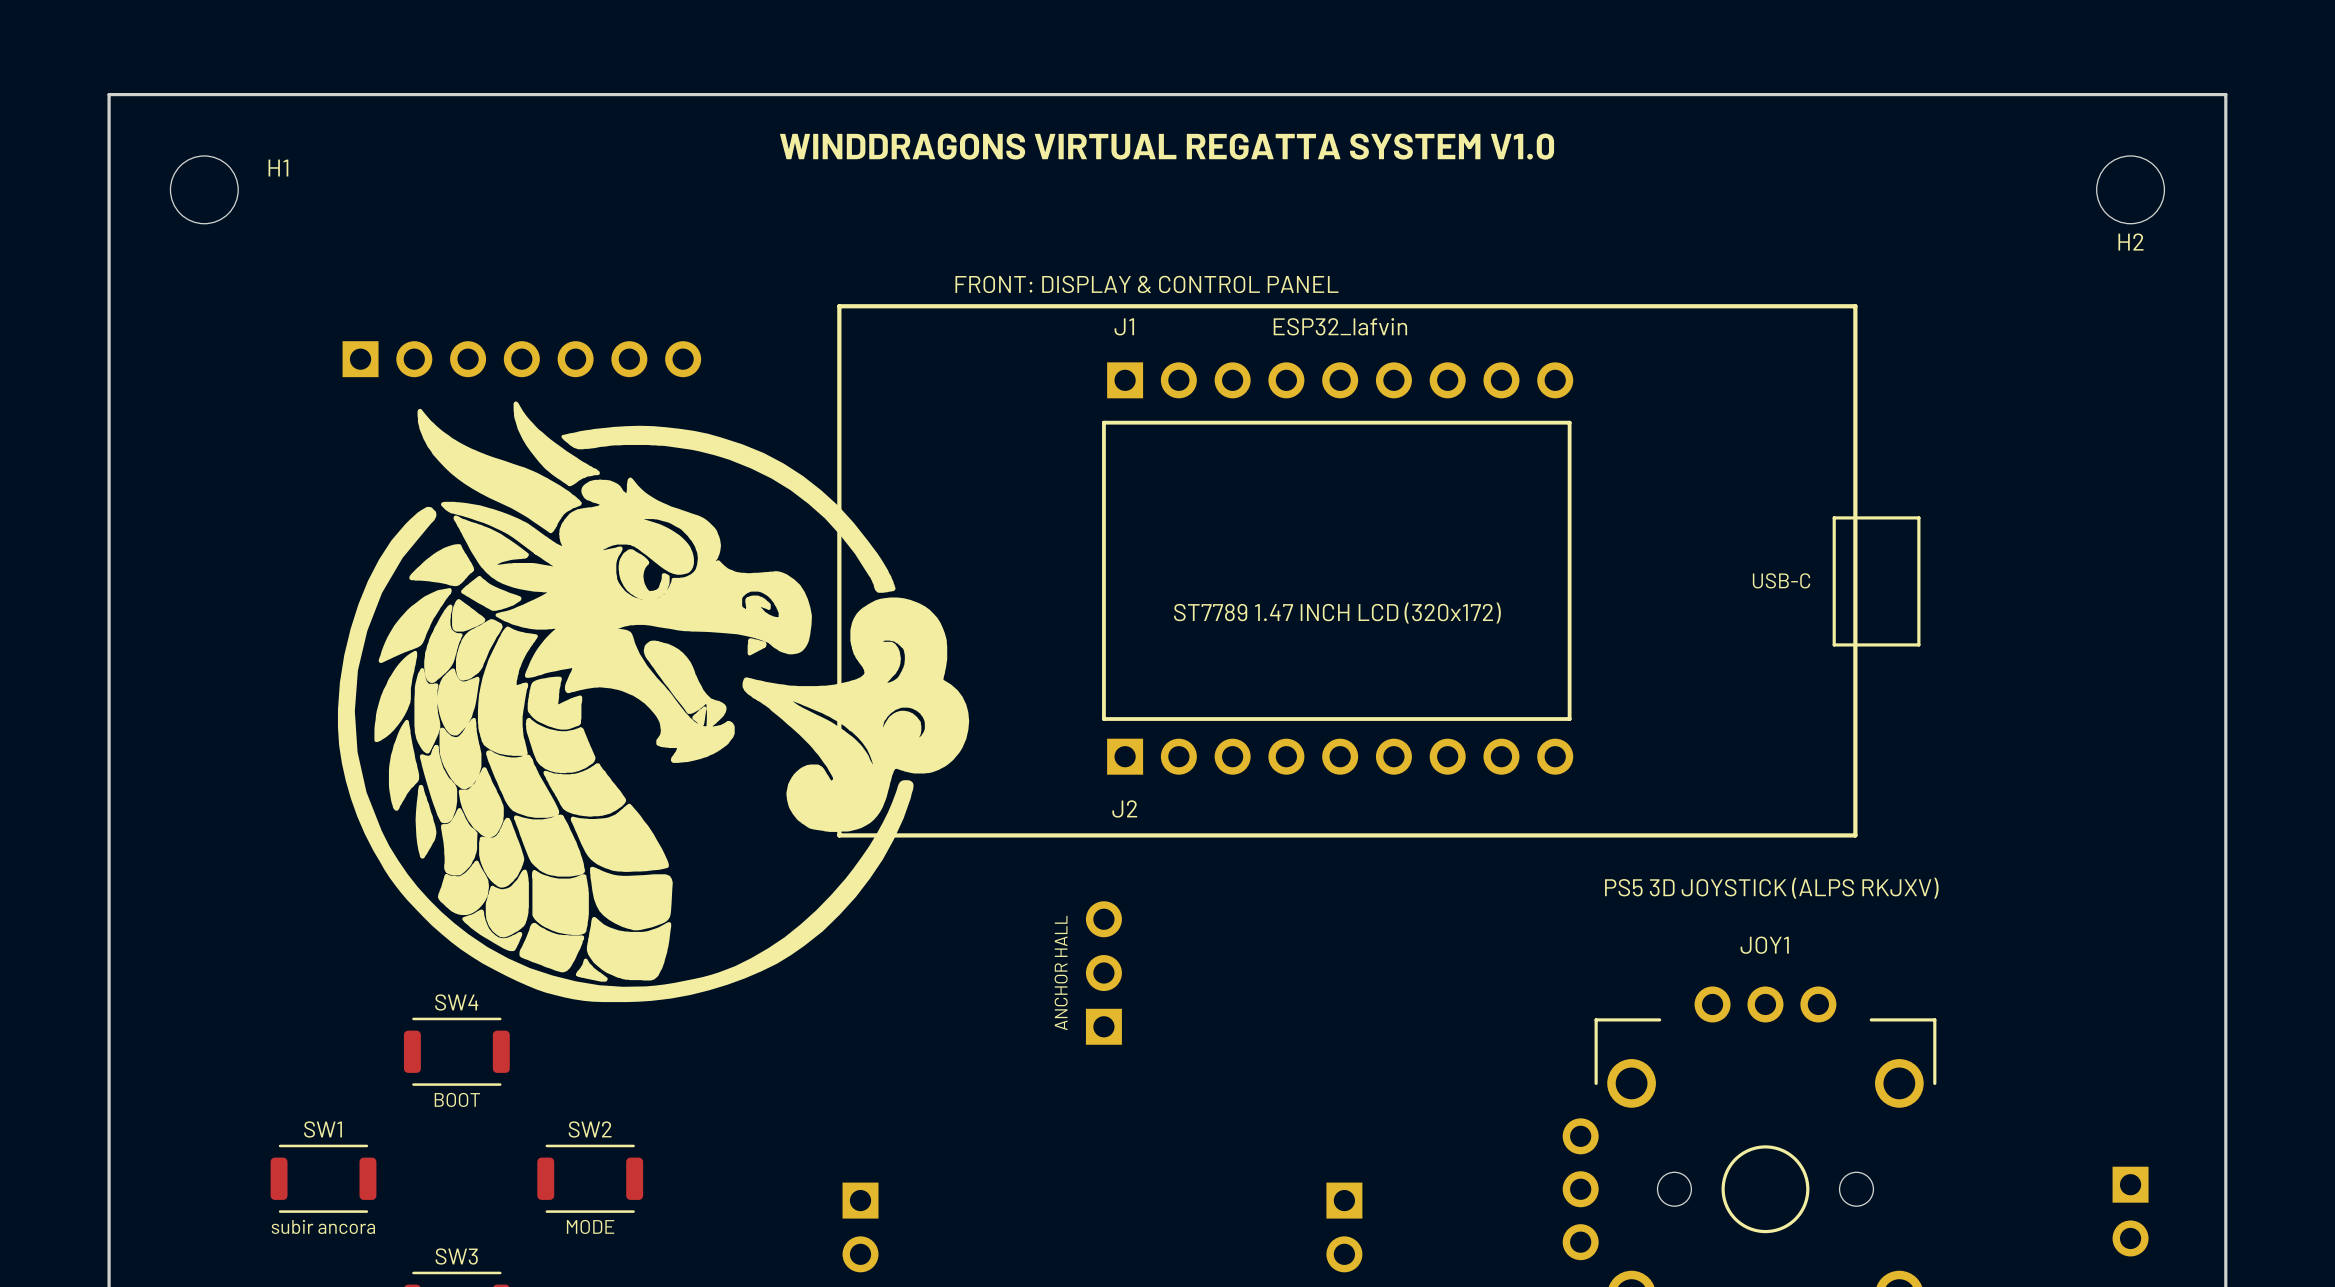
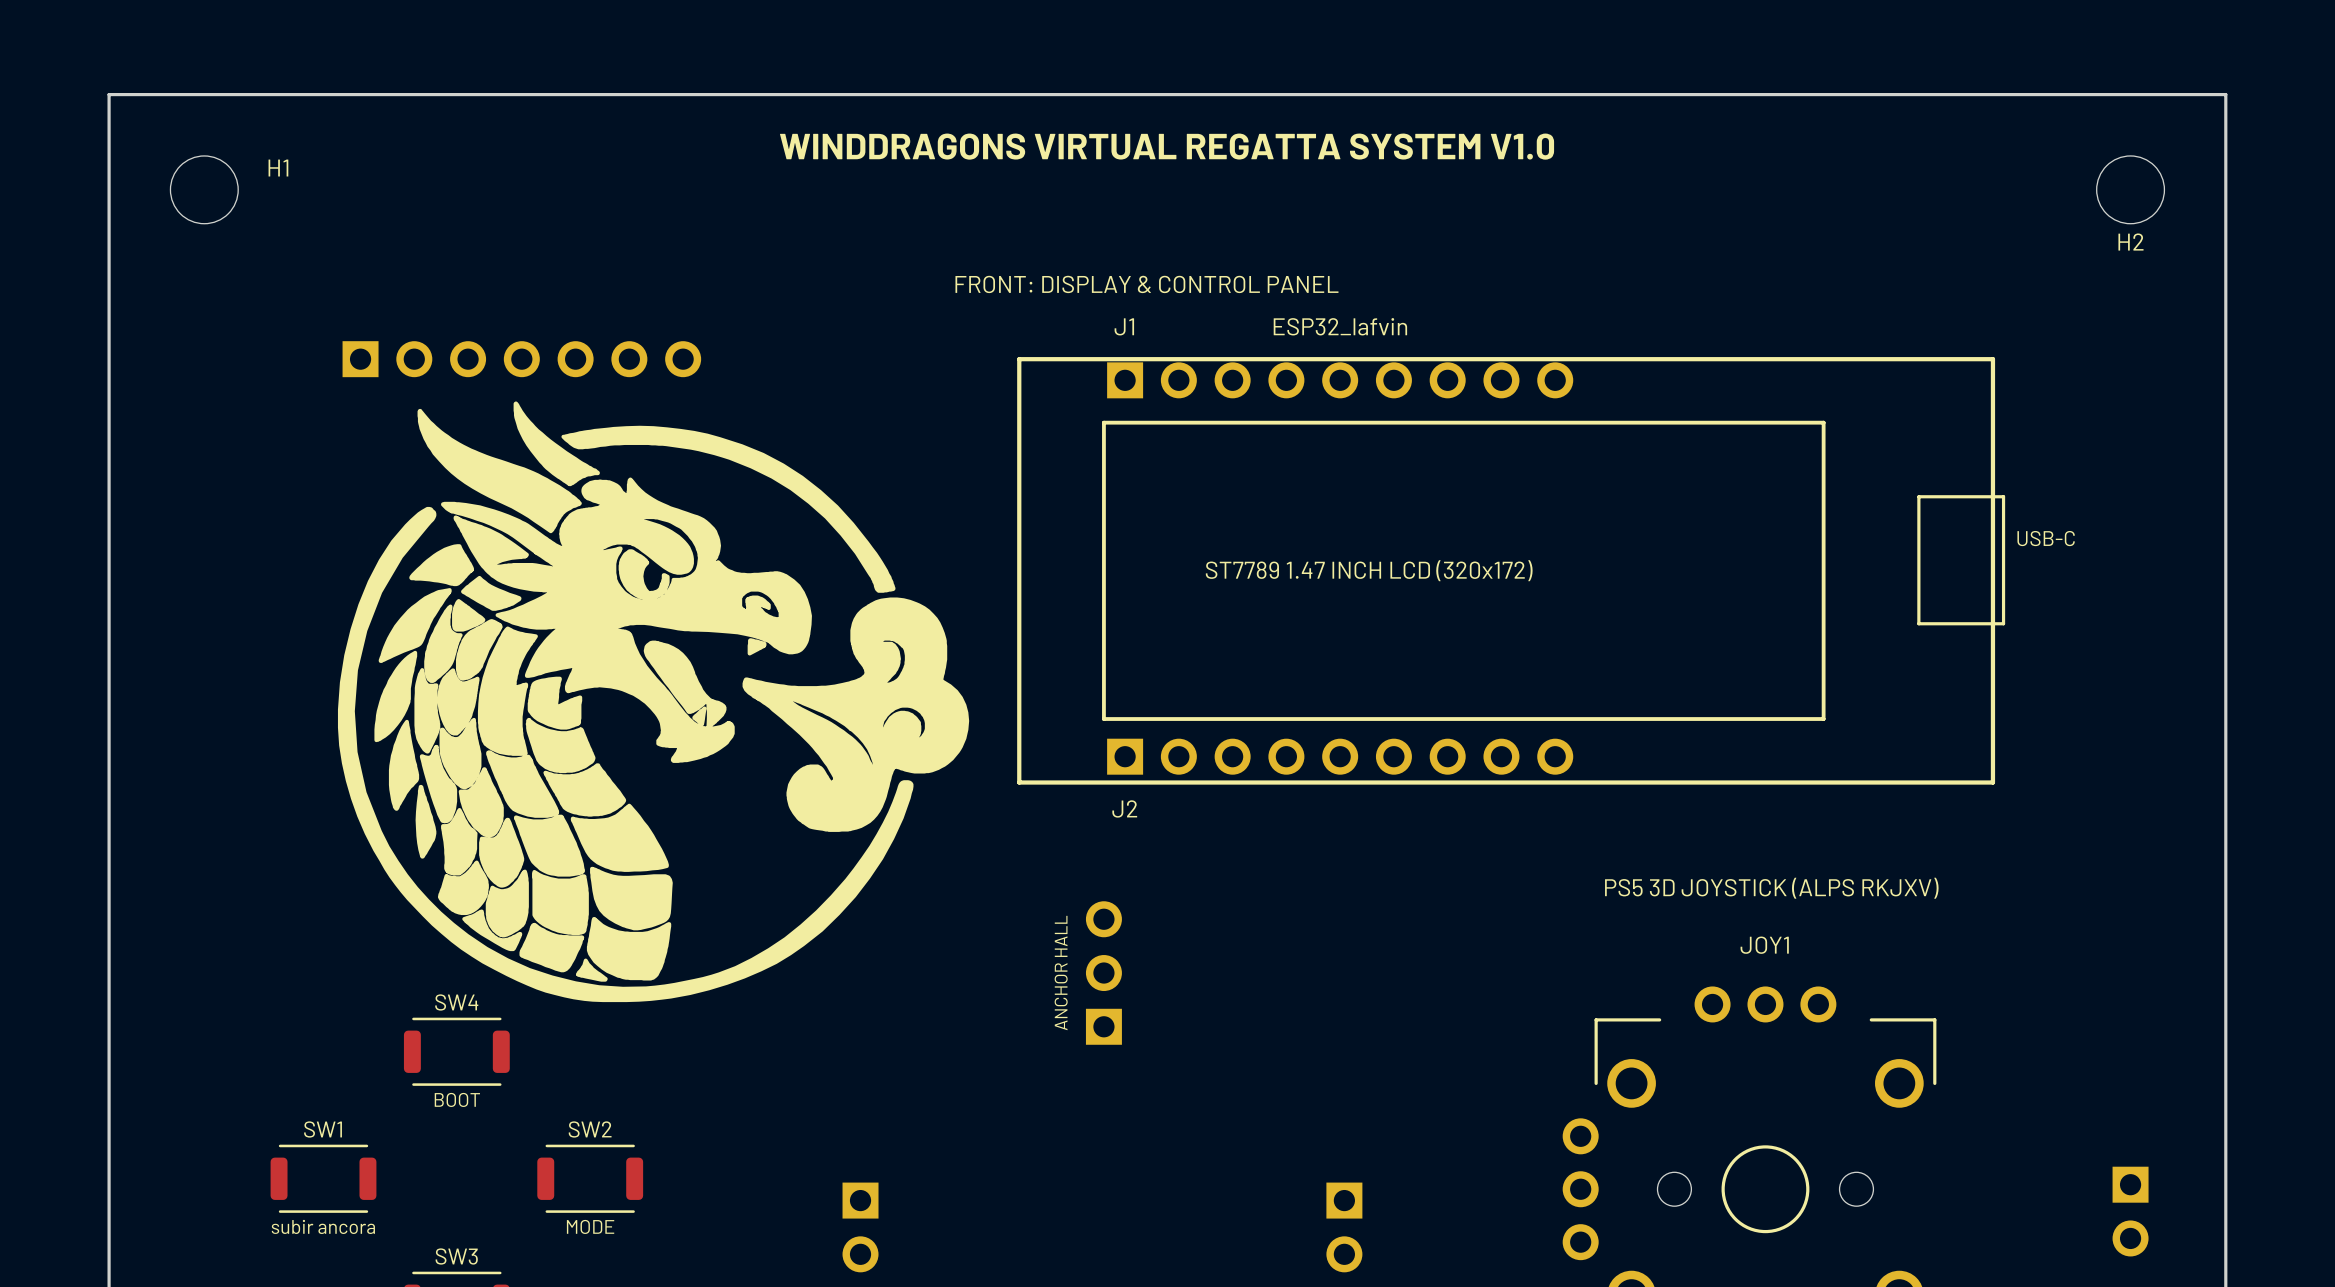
line: (839, 306) (1855, 306) (1855, 835) (839, 835) (839, 306) -> (1019, 359) (1019, 782) (1992, 782) (1992, 359) (1019, 359)
line: (1569, 422) (1569, 719) -> (1569, 422) (1823, 422) (1823, 719) (1569, 719)
line: (1918, 517) (1834, 517) (1834, 644) (1918, 644) (1918, 623) -> (1918, 517) (1918, 496) (2003, 496) (2003, 623) (1918, 623)
text position: USB-C (1781, 580) -> USB-C (2046, 538)
text position: ST7789 1.47 INCH LCD (320x172) (1337, 613) -> ST7789 1.47 INCH LCD (320x172) (1369, 570)

